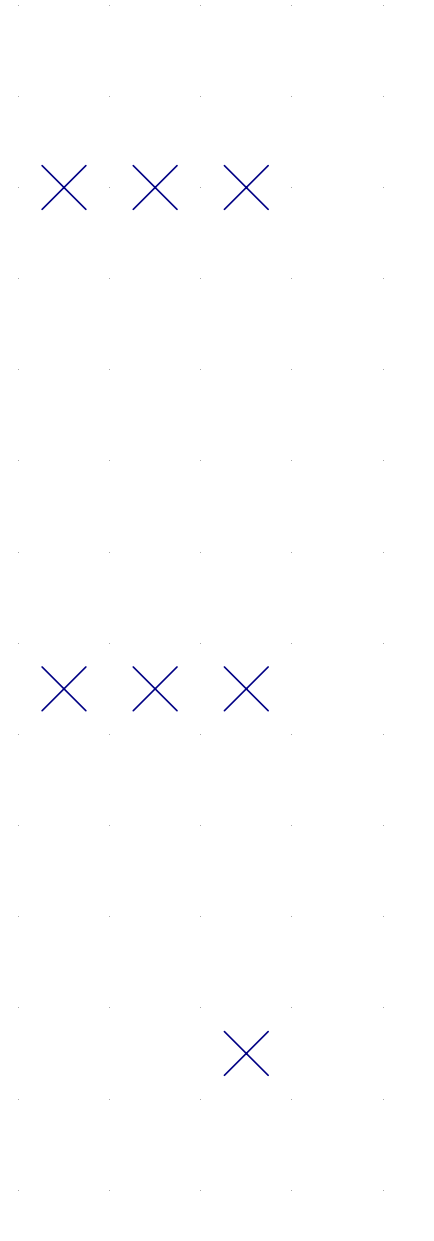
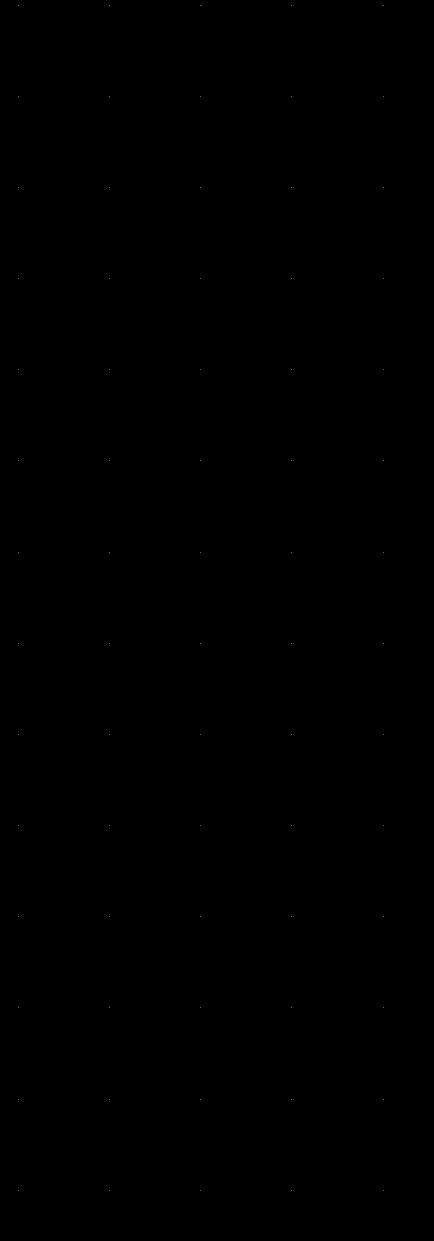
no-connect mark: (63, 187) -> none
no-connect mark: (155, 187) -> none
no-connect mark: (246, 187) -> none
no-connect mark: (63, 688) -> none
no-connect mark: (155, 688) -> none
no-connect mark: (246, 688) -> none
no-connect mark: (246, 1053) -> none

